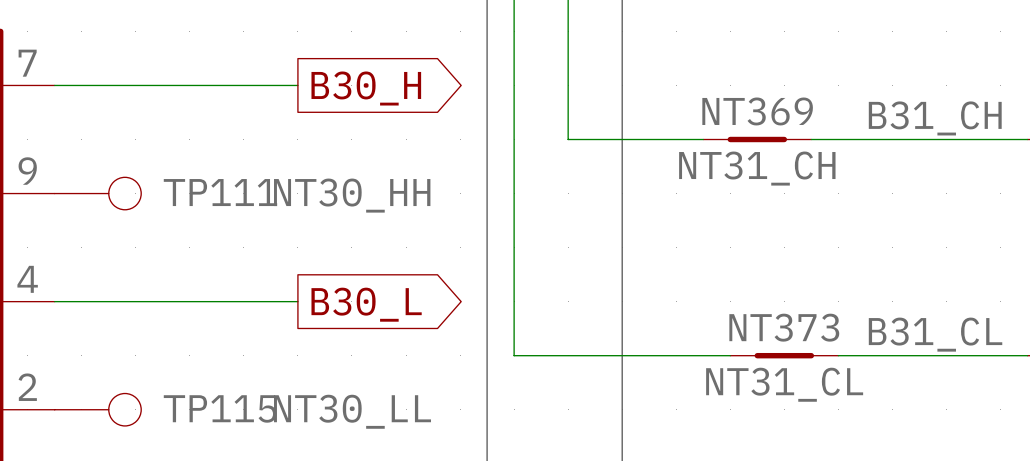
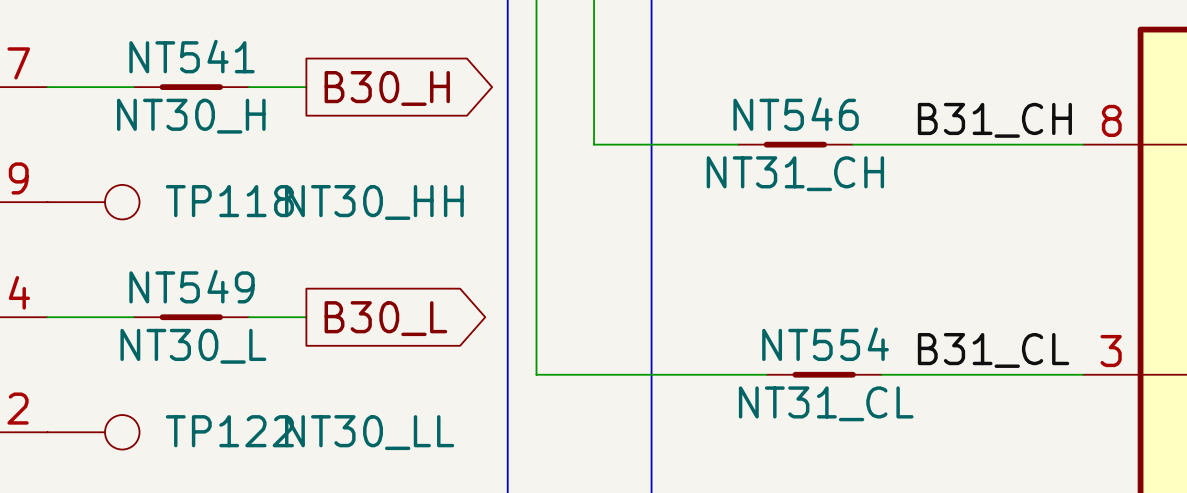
NT541: none -> NT30_H (191, 87)
NT369 name: NT369 (757, 111) -> NT546 (796, 114)
TP111 name: TP111 (220, 192) -> TP118 (229, 201)
NT549: none -> NT30_L (191, 317)
NT373 name: NT373 (784, 327) -> NT554 (825, 344)
TP115 name: TP115 (220, 408) -> TP122 (229, 431)

